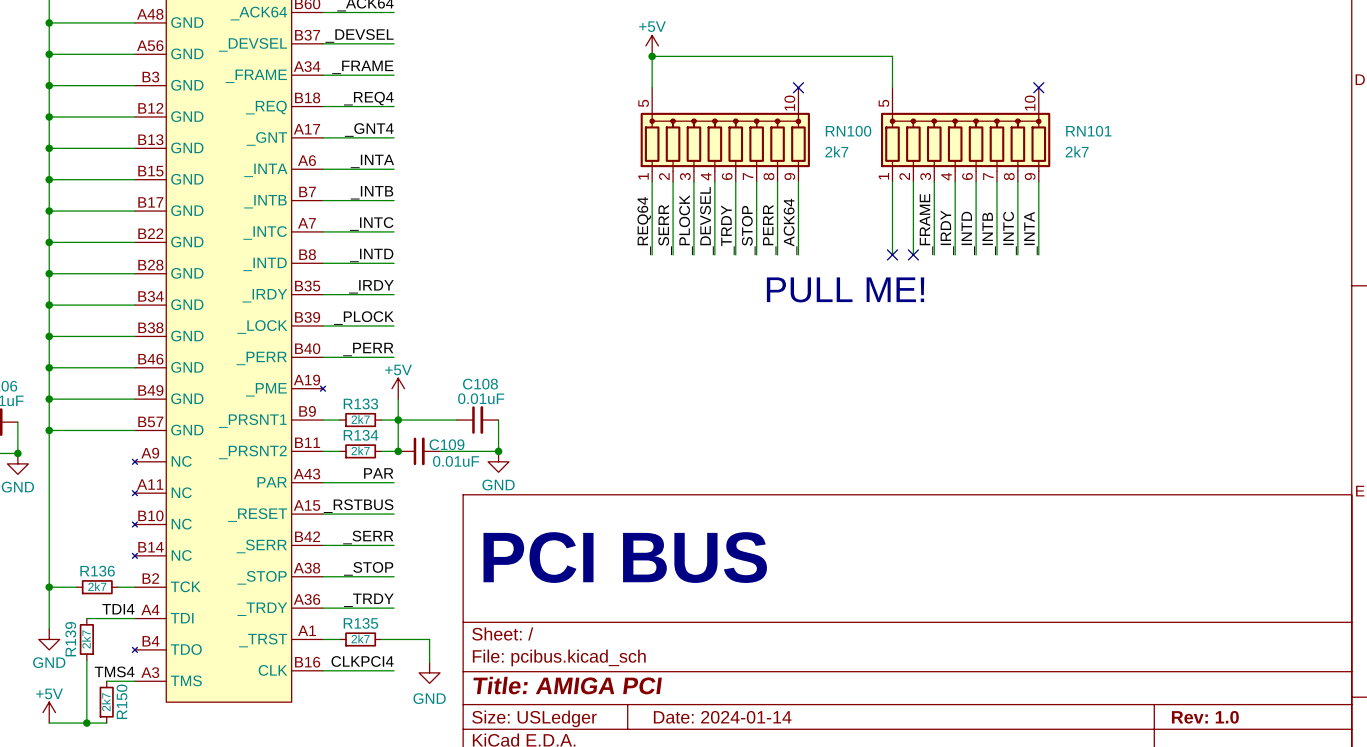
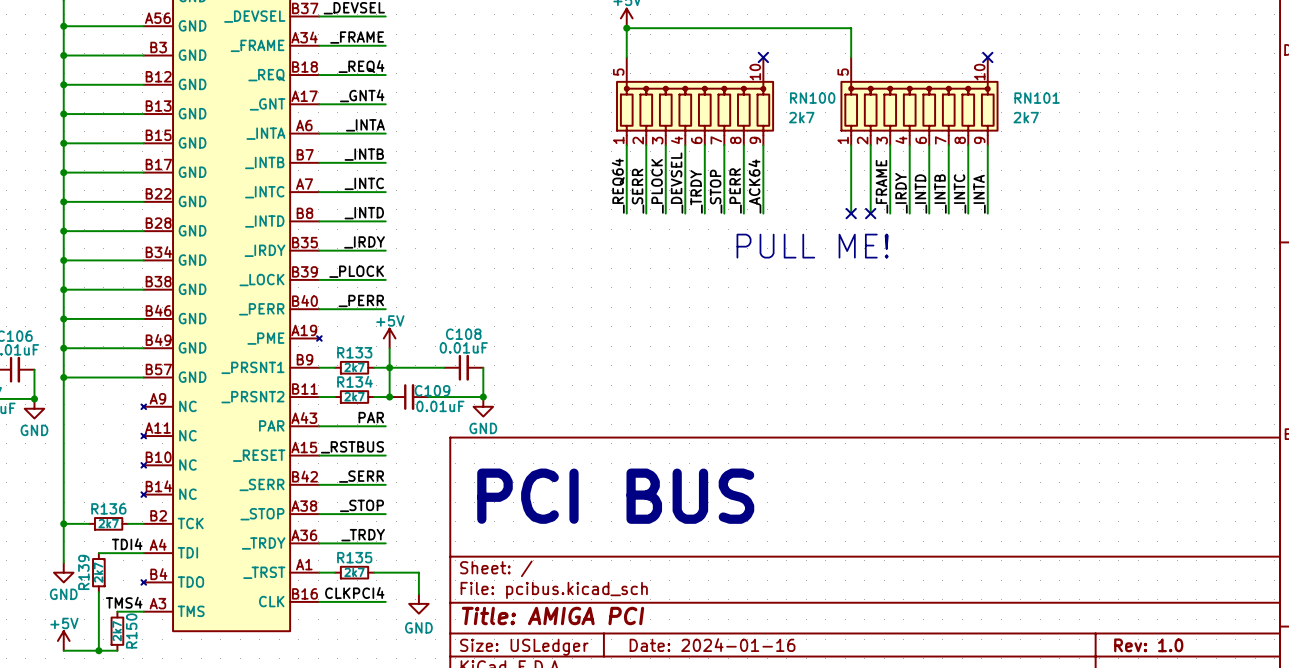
title block: Date: 2024-01-14 (722, 717) -> Date: 2024-01-16 (712, 645)

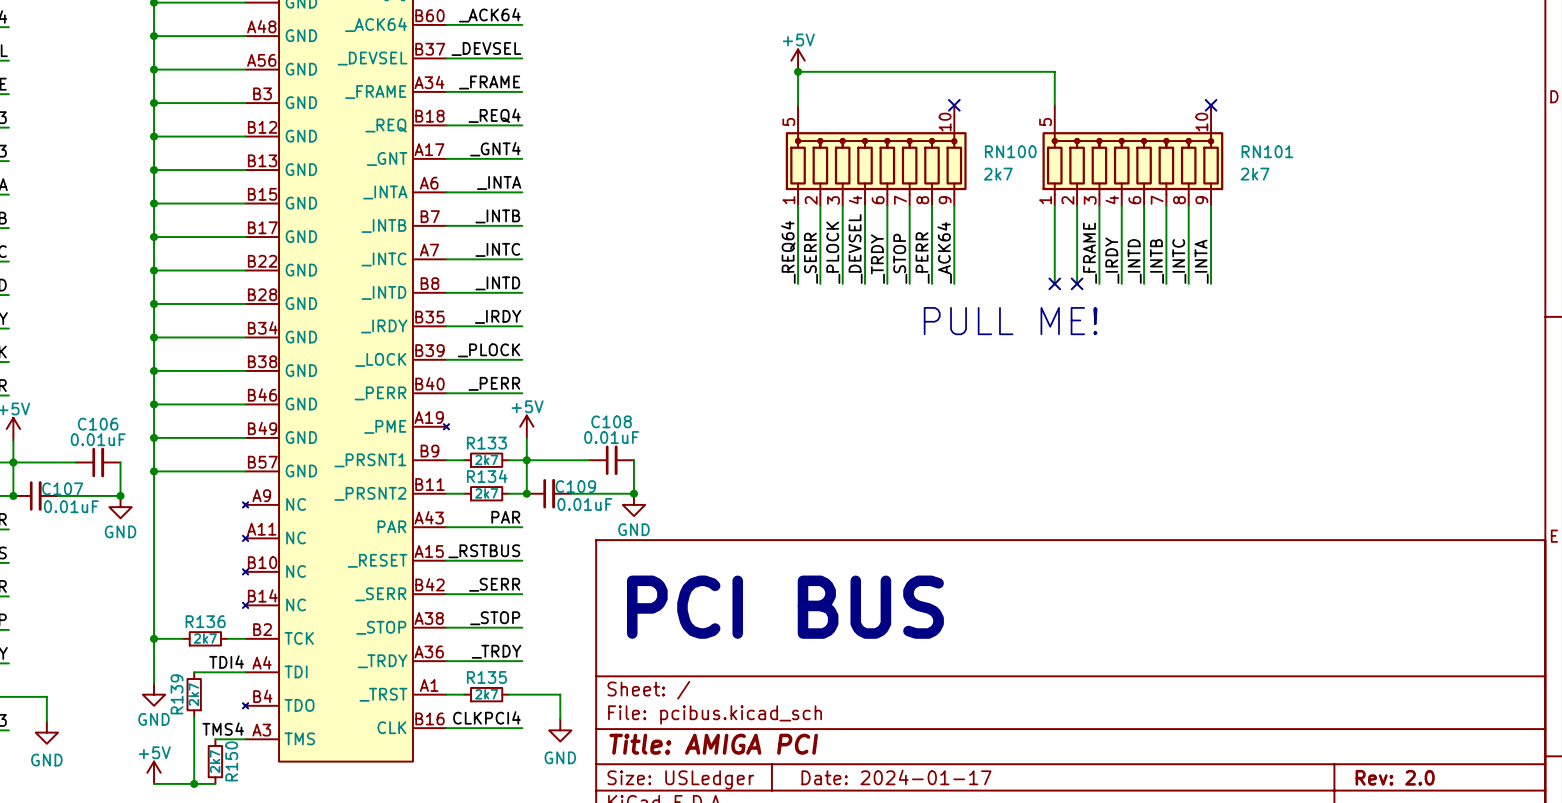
title block: Date: 2024-01-16 (712, 645) -> Date: 2024-01-17 (896, 777)
title block: Rev: 1.0 (1148, 645) -> Rev: 2.0 (1395, 777)

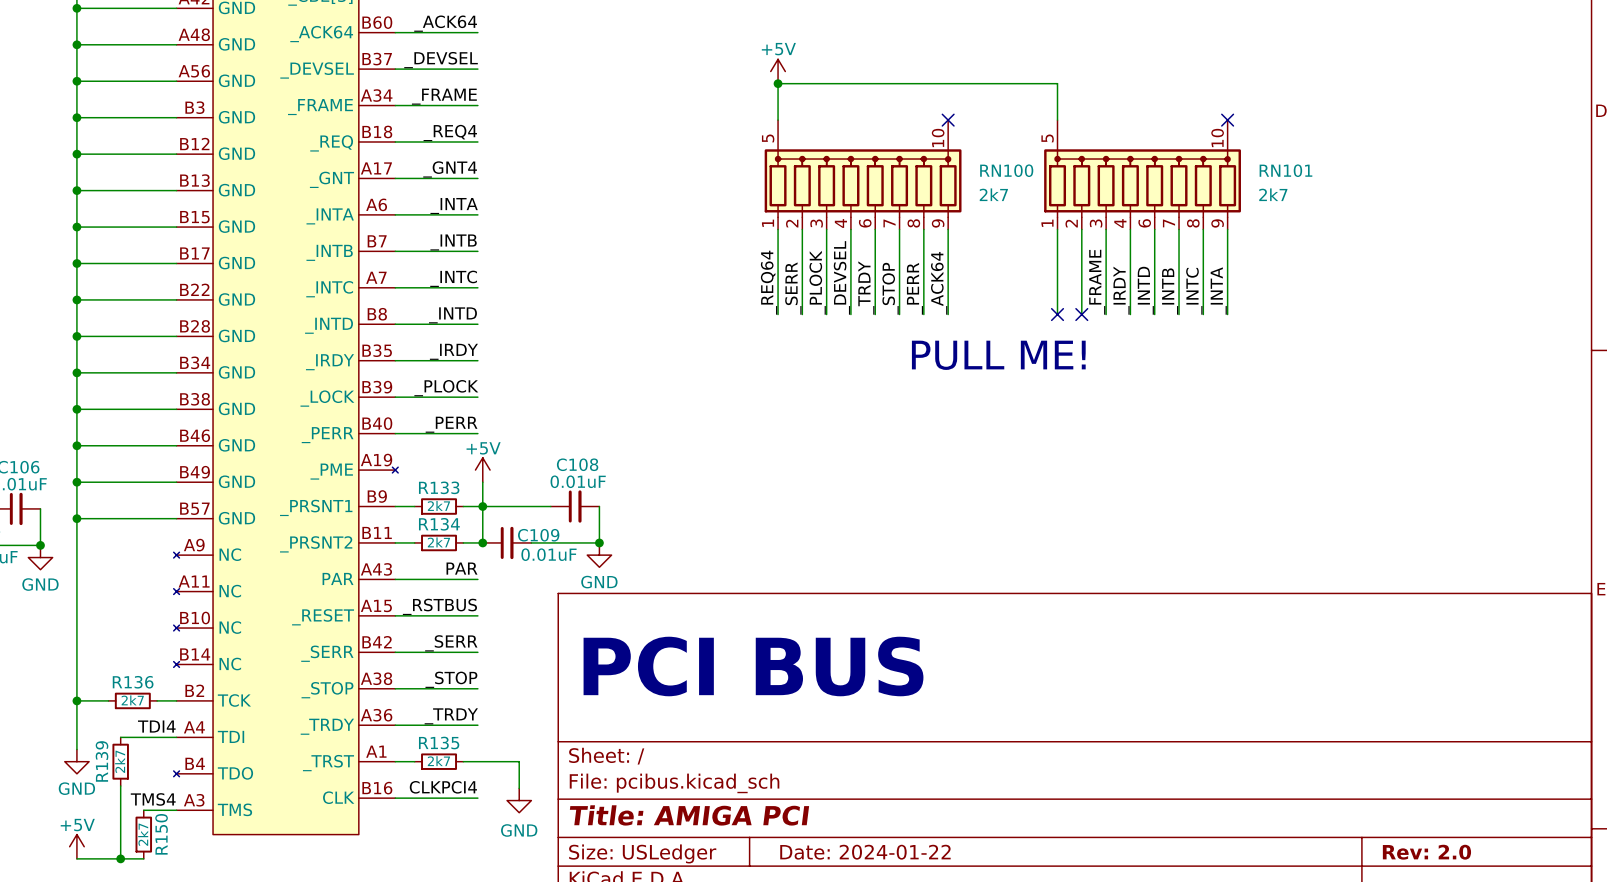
title block: Date: 2024-01-17 (896, 777) -> Date: 2024-01-22 (865, 852)

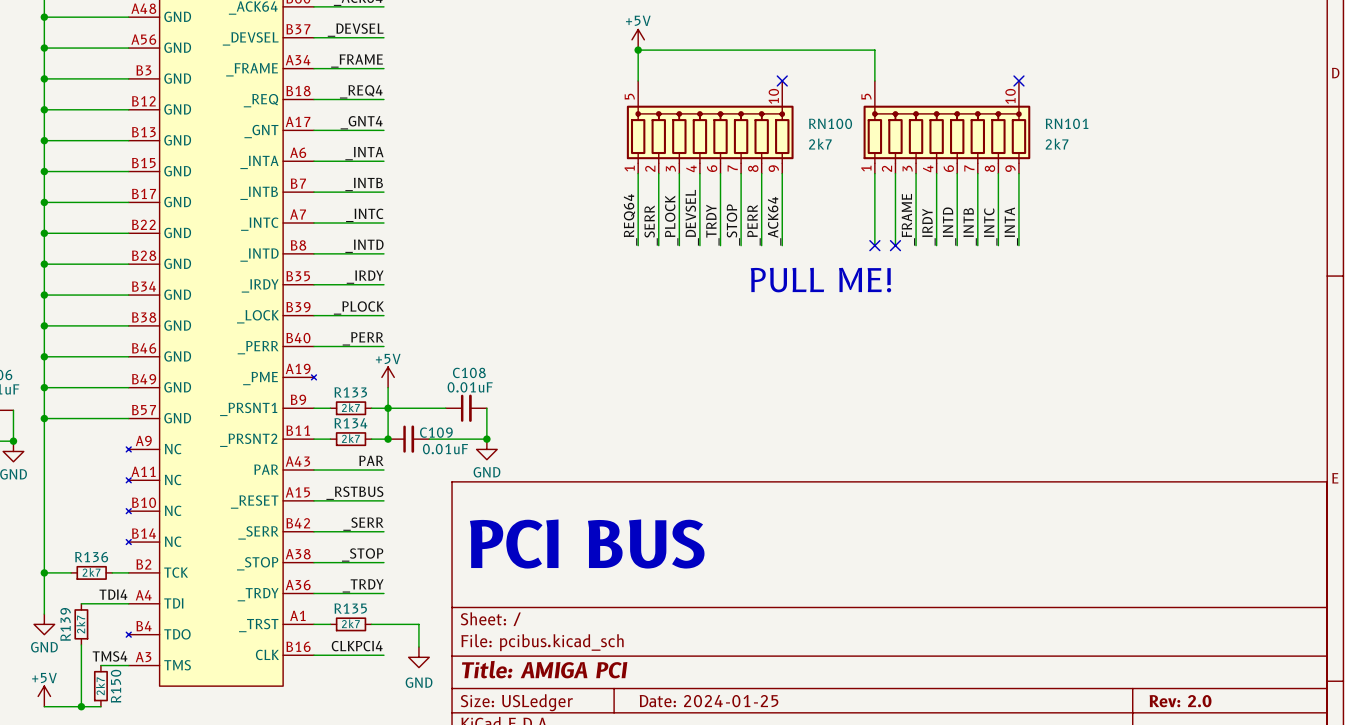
title block: Date: 2024-01-22 (865, 852) -> Date: 2024-01-25 (709, 701)

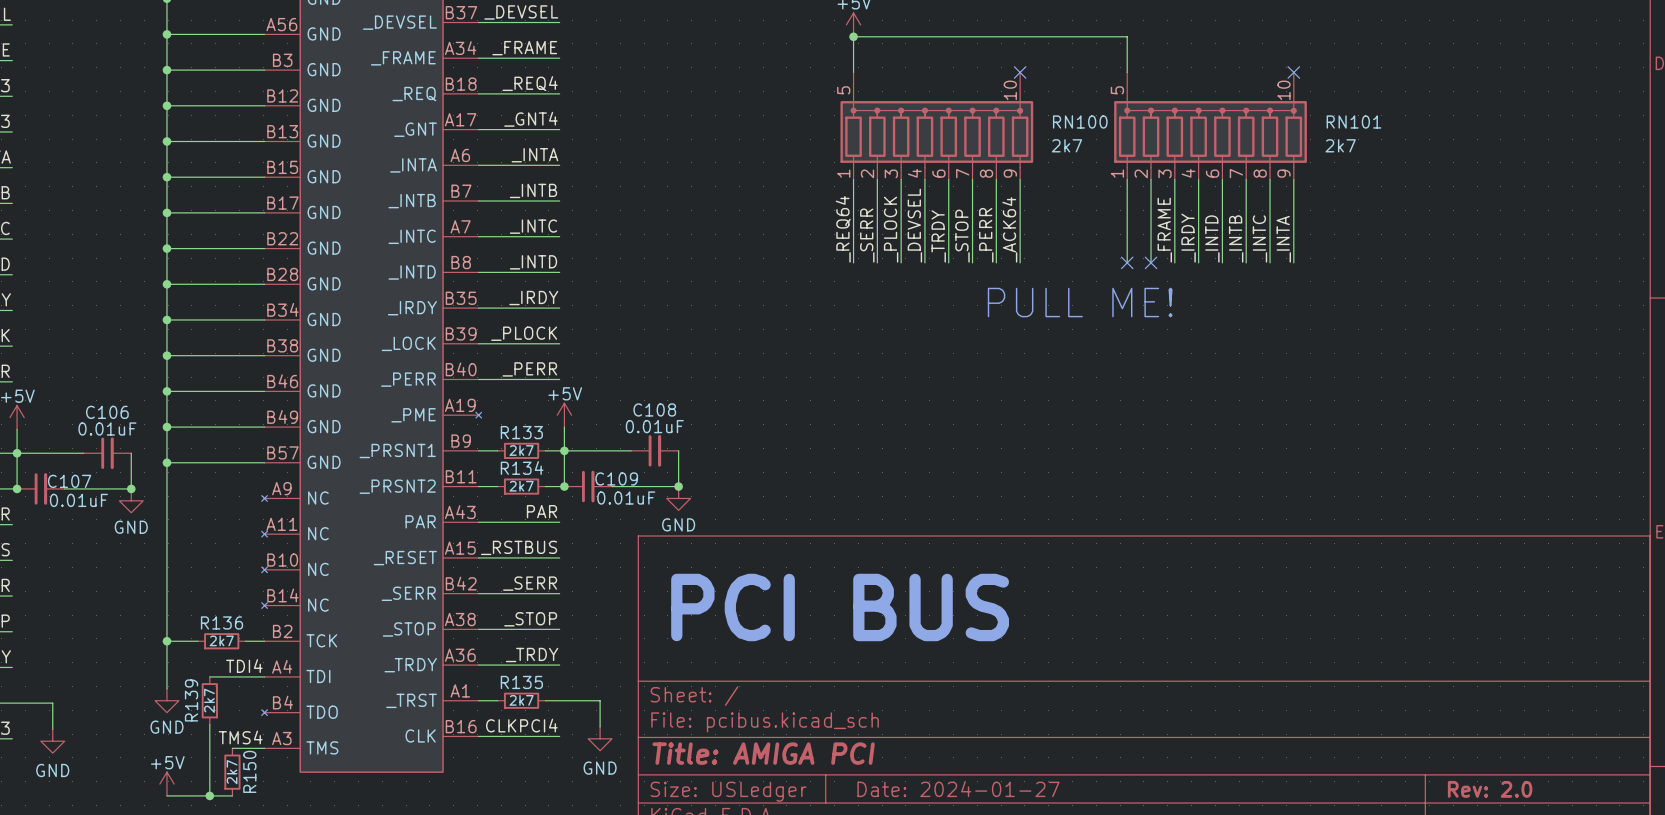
title block: Date: 2024-01-25 (709, 701) -> Date: 2024-01-27 (958, 789)

